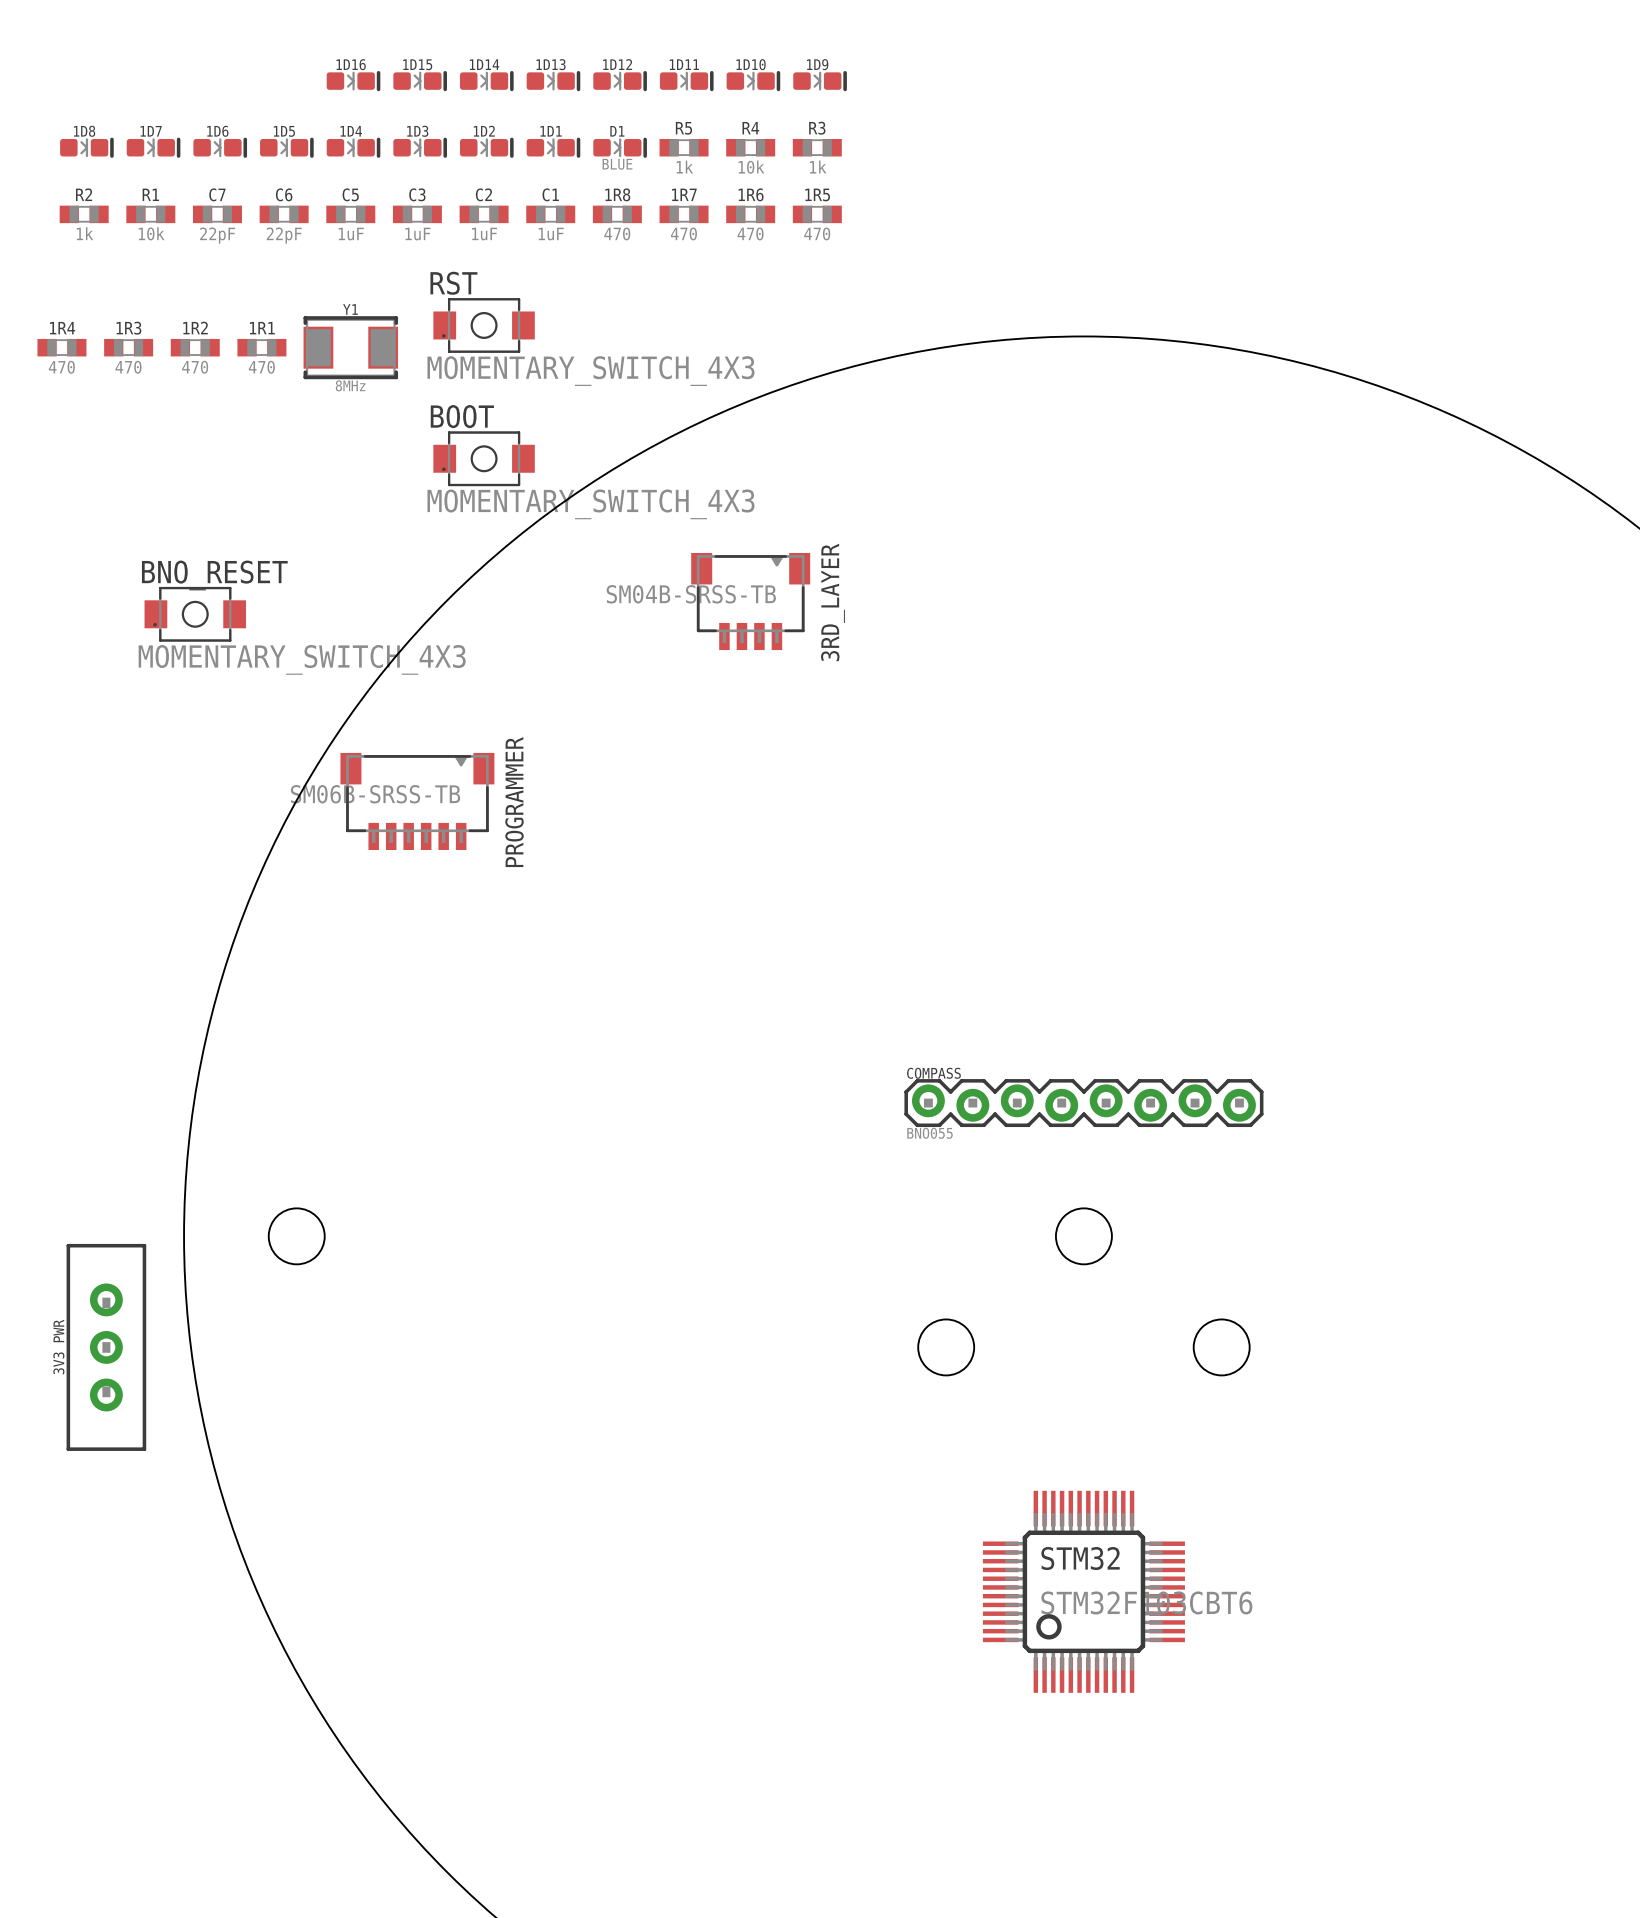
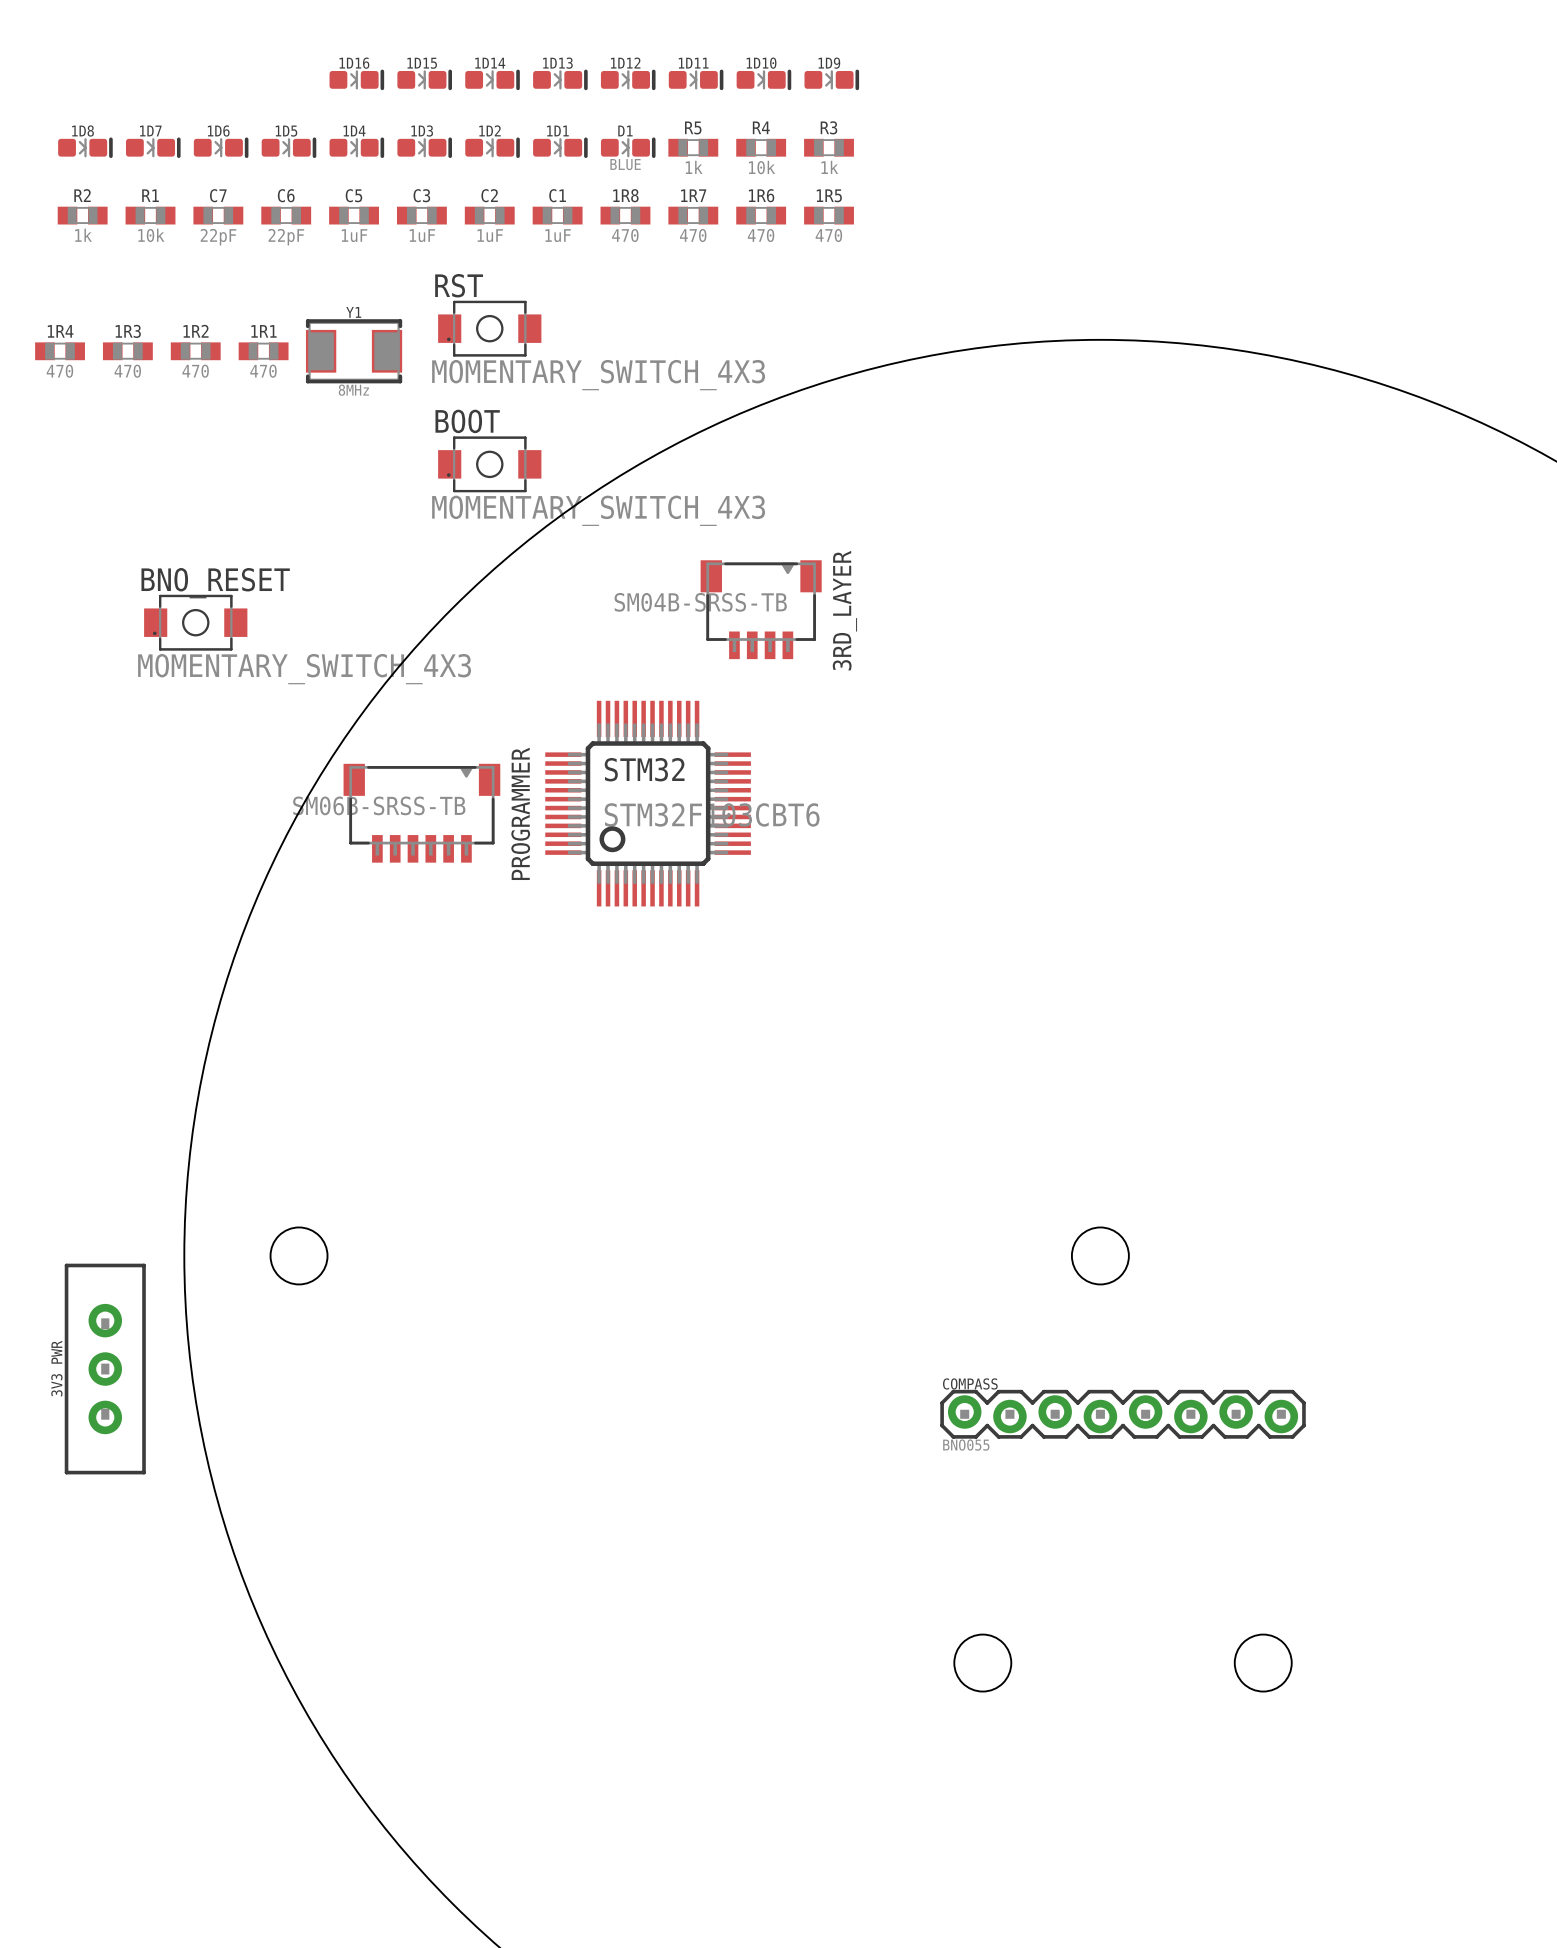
COMPASS position: (1083, 1227) -> (1123, 1540)
STM32 position: (1083, 1591) -> (648, 803)

